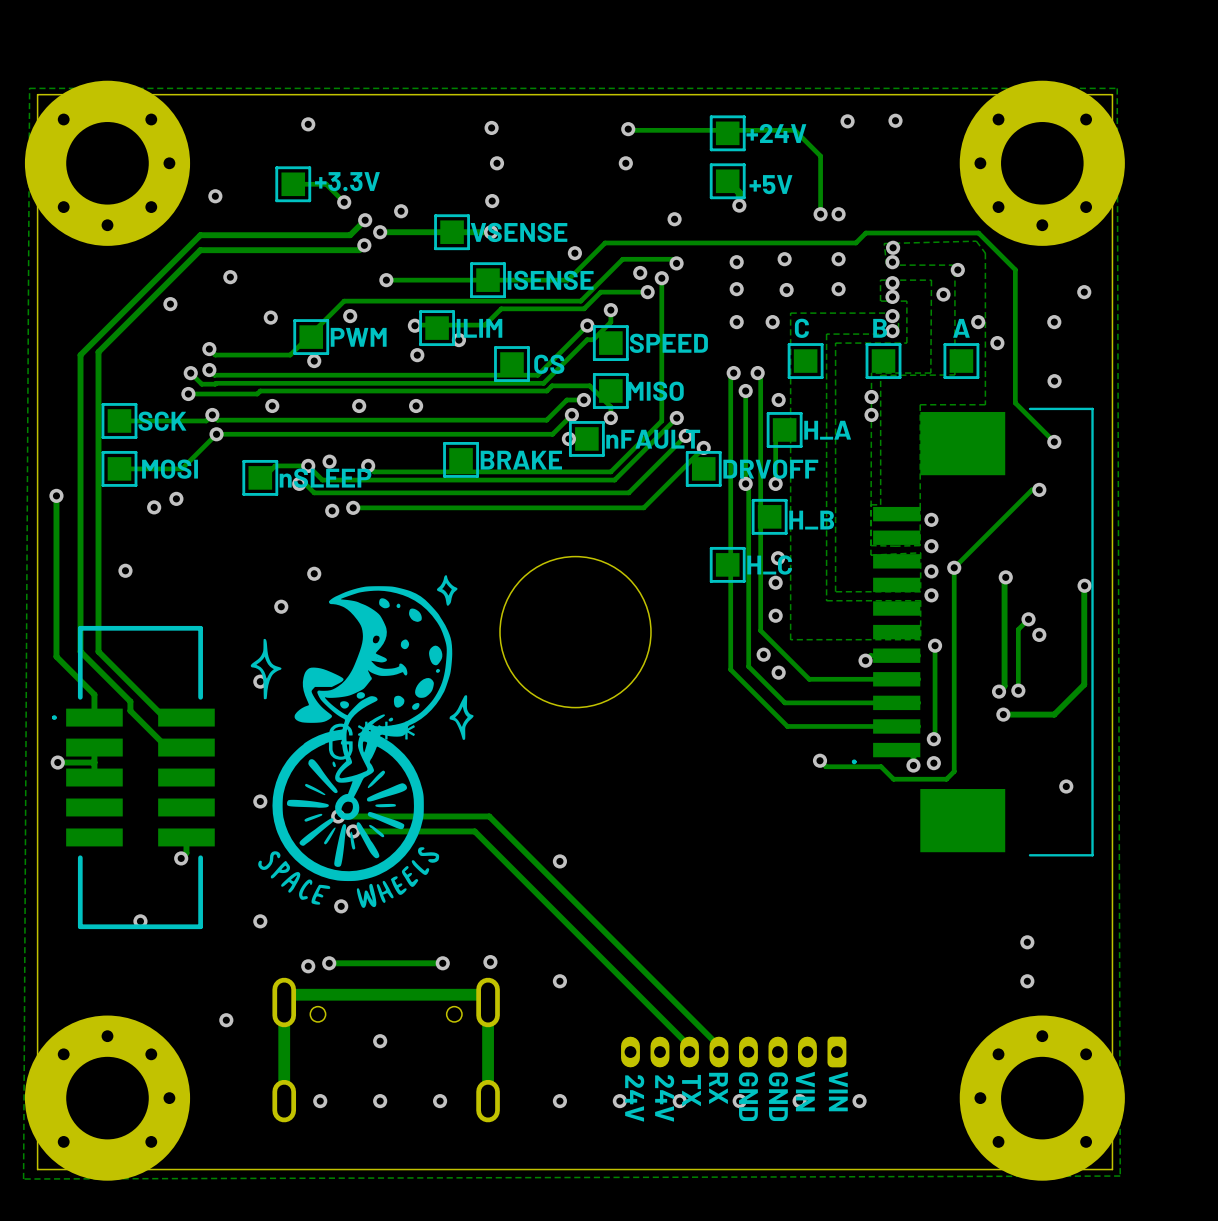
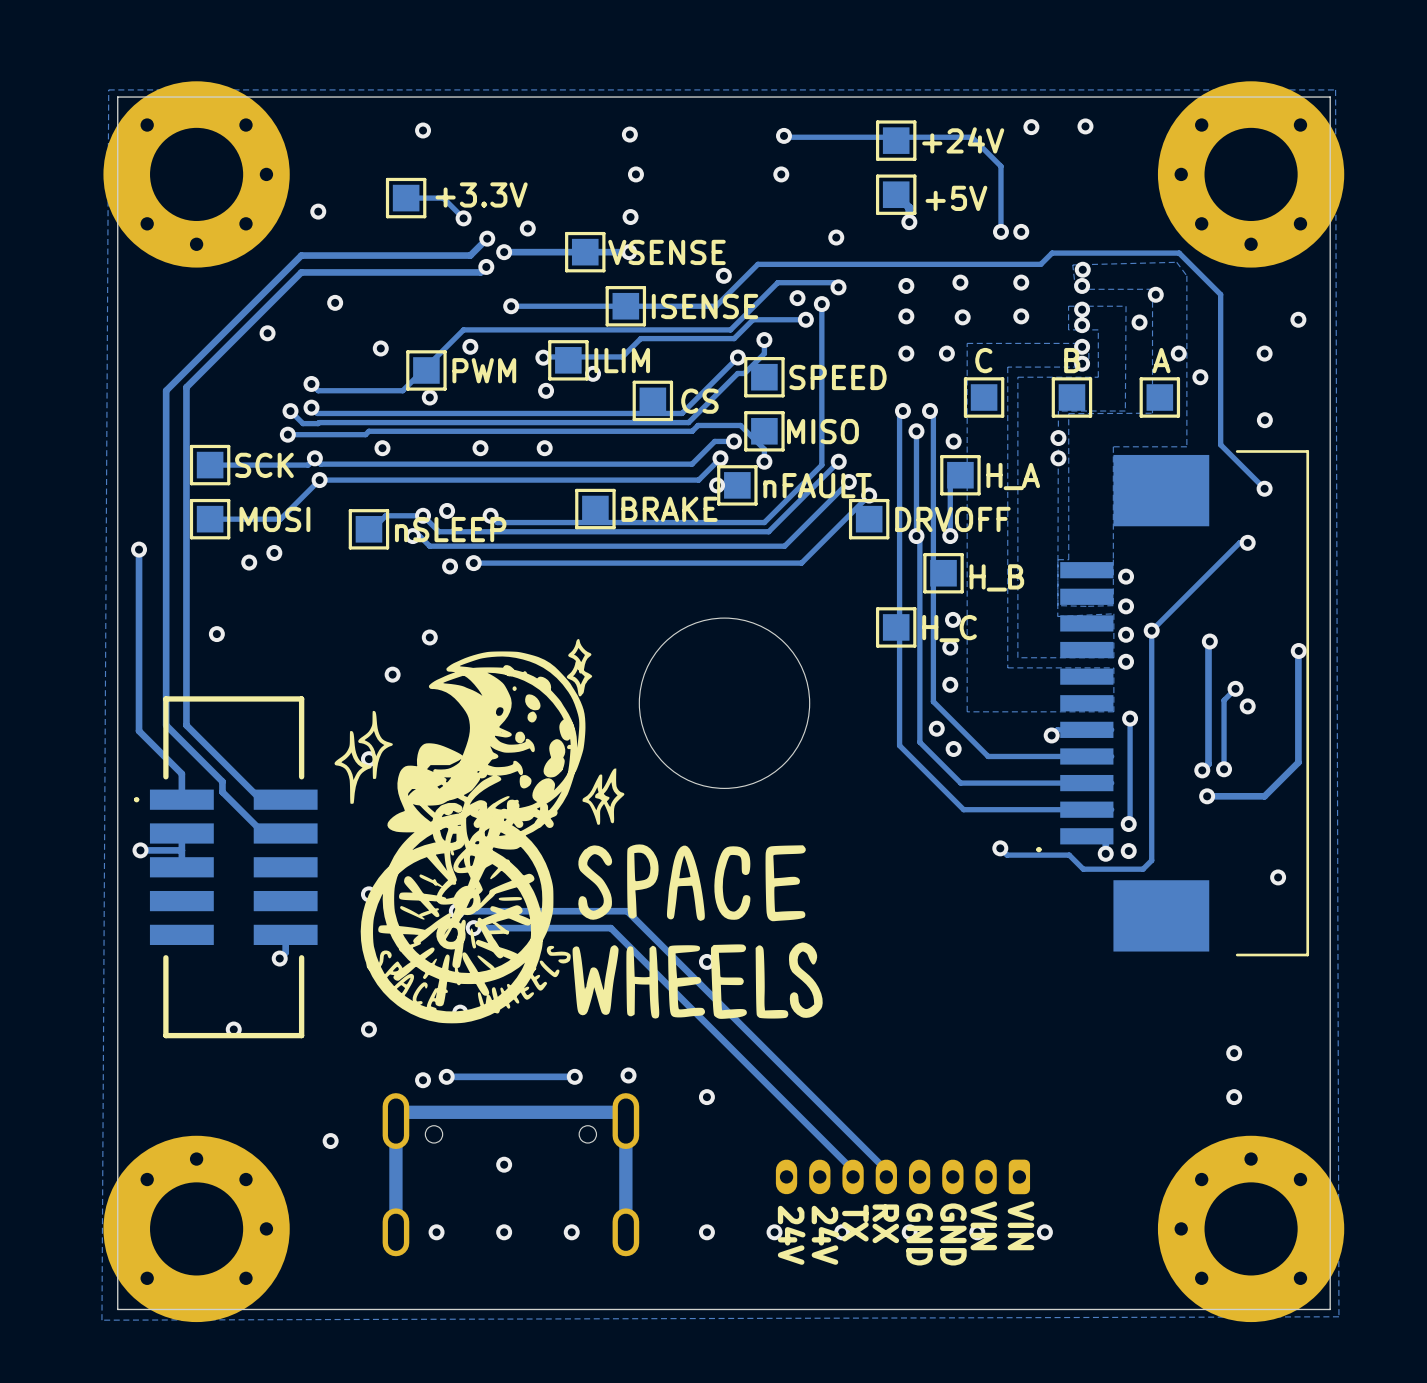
drawing: none -> [334, 659, 823, 1024]

